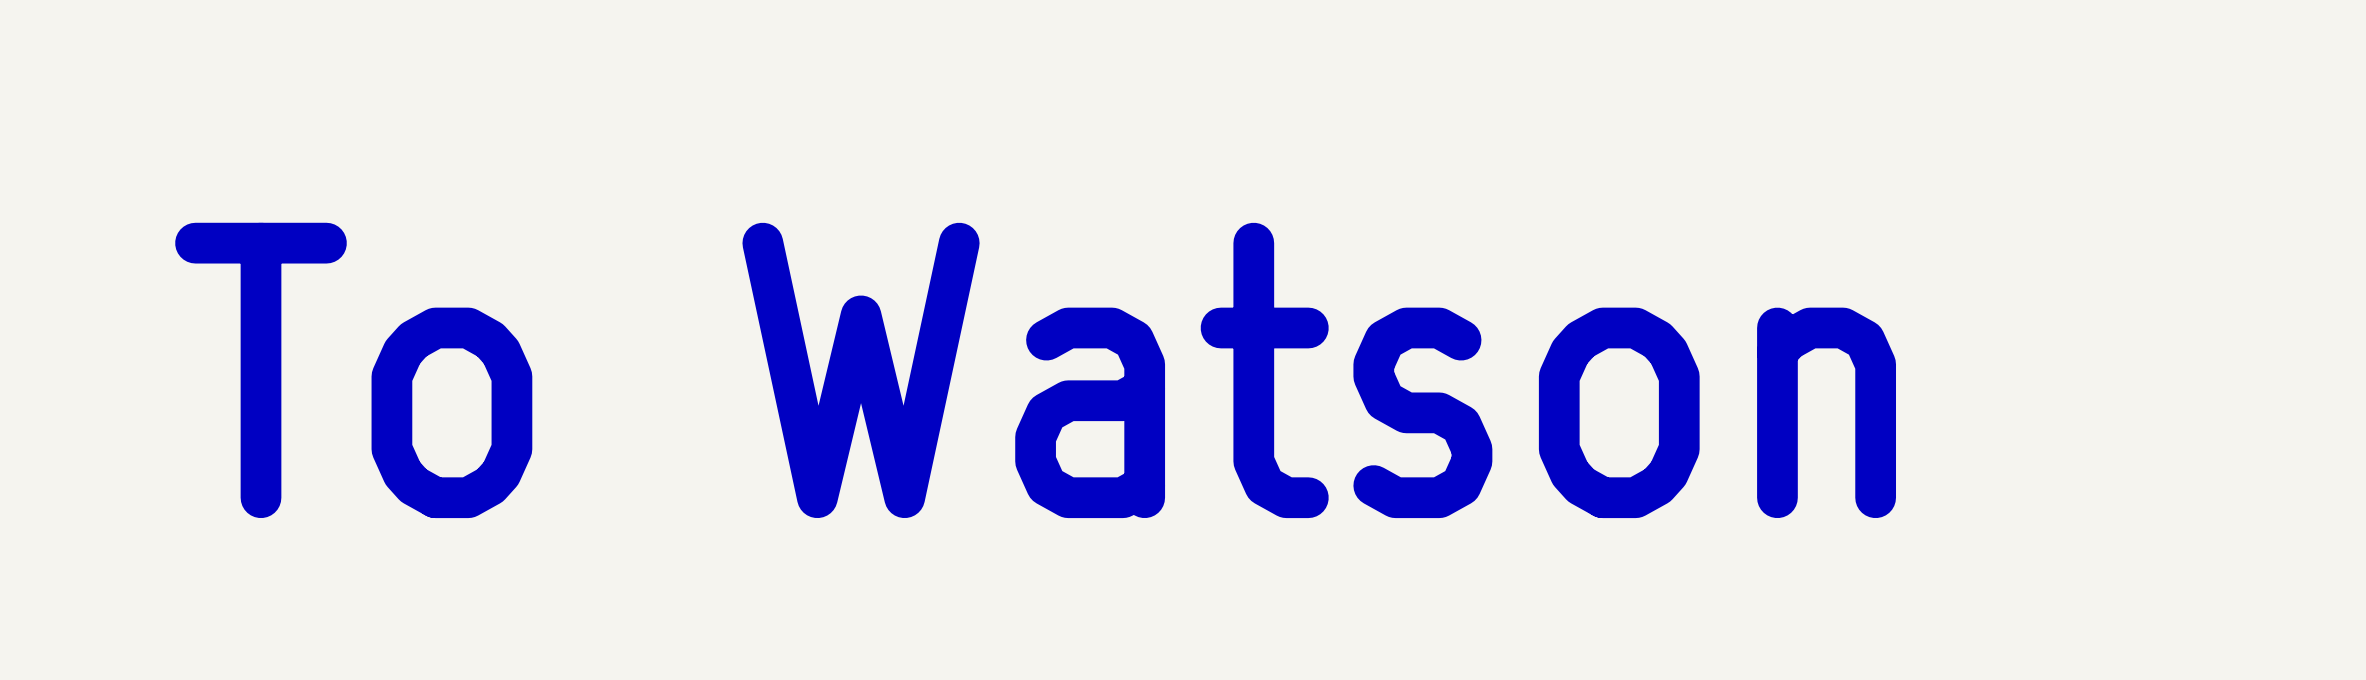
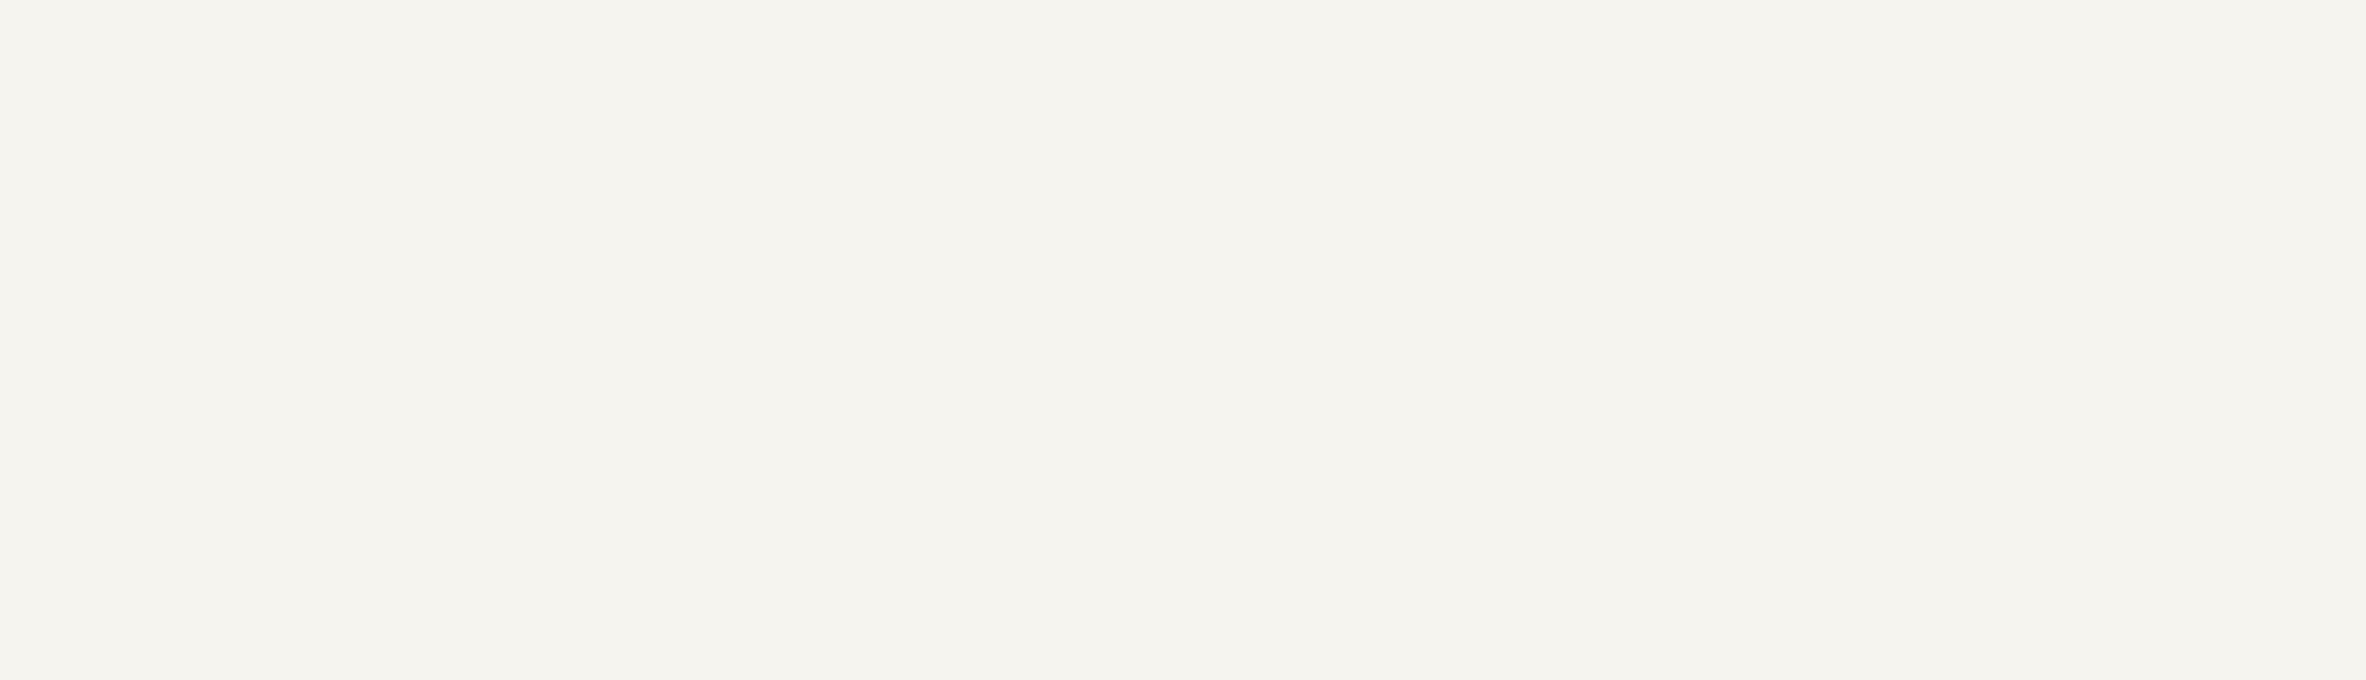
text: To Watson (1035, 370) -> none

